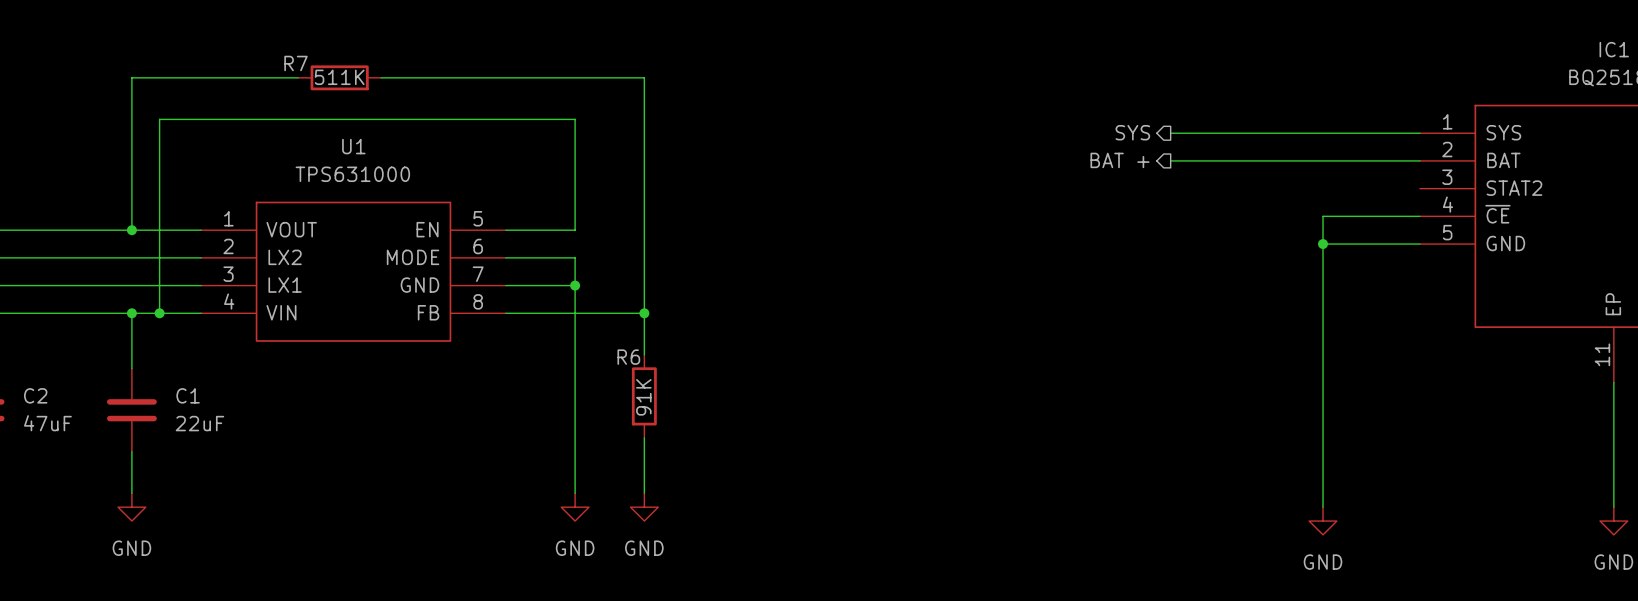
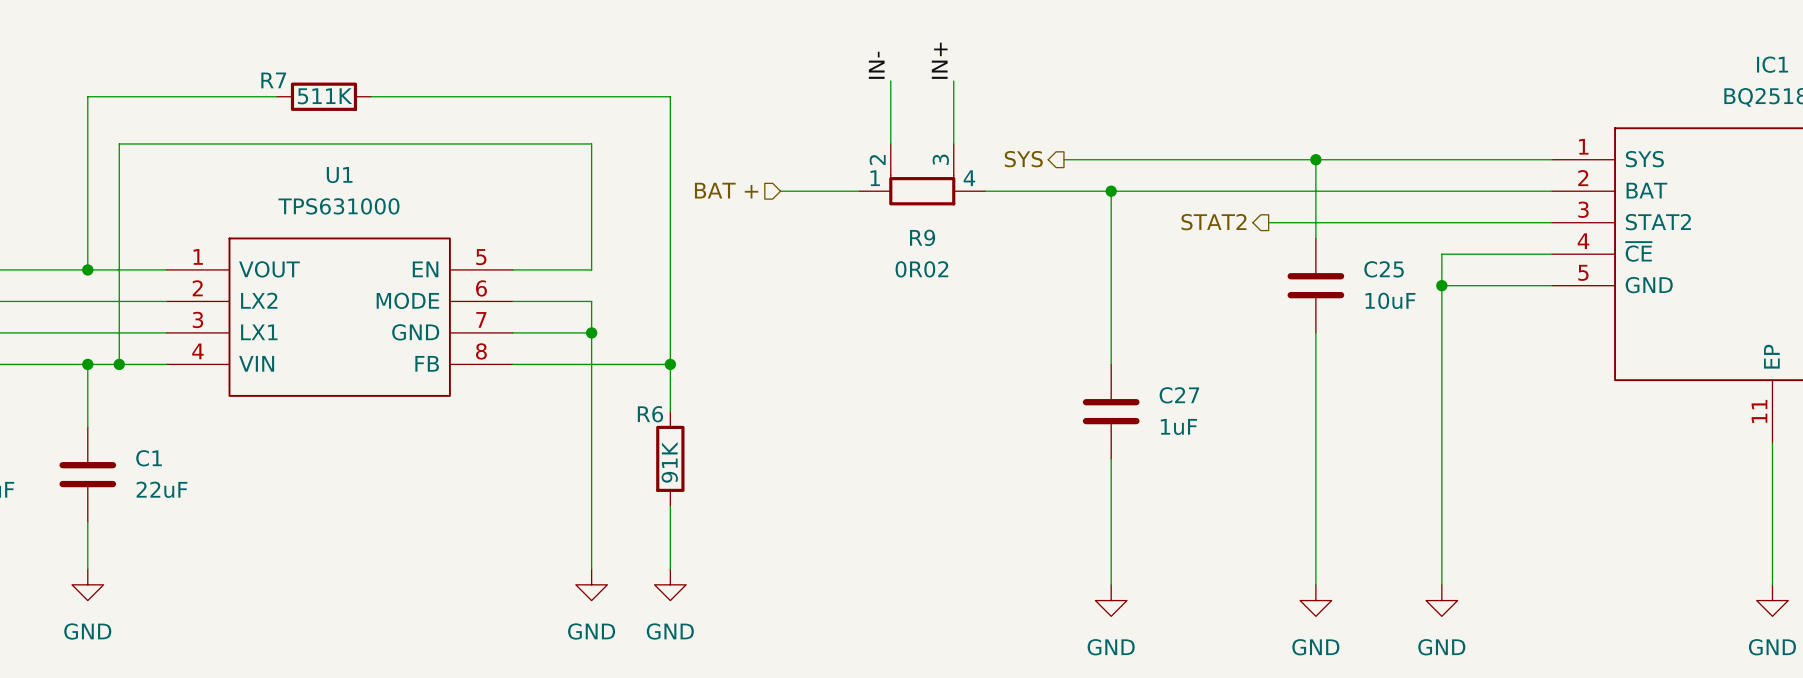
label: none -> IN- (876, 65)
label: none -> IN+ (939, 60)
wire: none -> (890, 81) (890, 143)
wire: none -> (953, 81) (953, 143)
hierarchical label position: SYS (1132, 132) -> SYS (1023, 159)
wire: none -> (1063, 159) (1268, 159)
wire: none -> (1315, 159) (1315, 238)
junction: none -> (1315, 159)
R9: none -> 0R02 (922, 174)
hierarchical label: none -> BAT + (726, 190)
wire: none -> (780, 191) (859, 191)
wire: none -> (985, 191) (1268, 191)
wire: none -> (1111, 191) (1111, 364)
junction: none -> (1111, 191)
hierarchical label: BAT + (1119, 160) -> none
hierarchical label: none -> STAT2 (1213, 222)
wire: none -> (1268, 222) (1552, 222)
C25: none -> 10uF (1315, 285)
wire: none -> (1315, 332) (1315, 584)
C27: none -> 1uF (1111, 411)
wire: none -> (1111, 458) (1111, 584)
power symbol: none -> GND (1111, 600)
power symbol: none -> GND (1315, 600)

